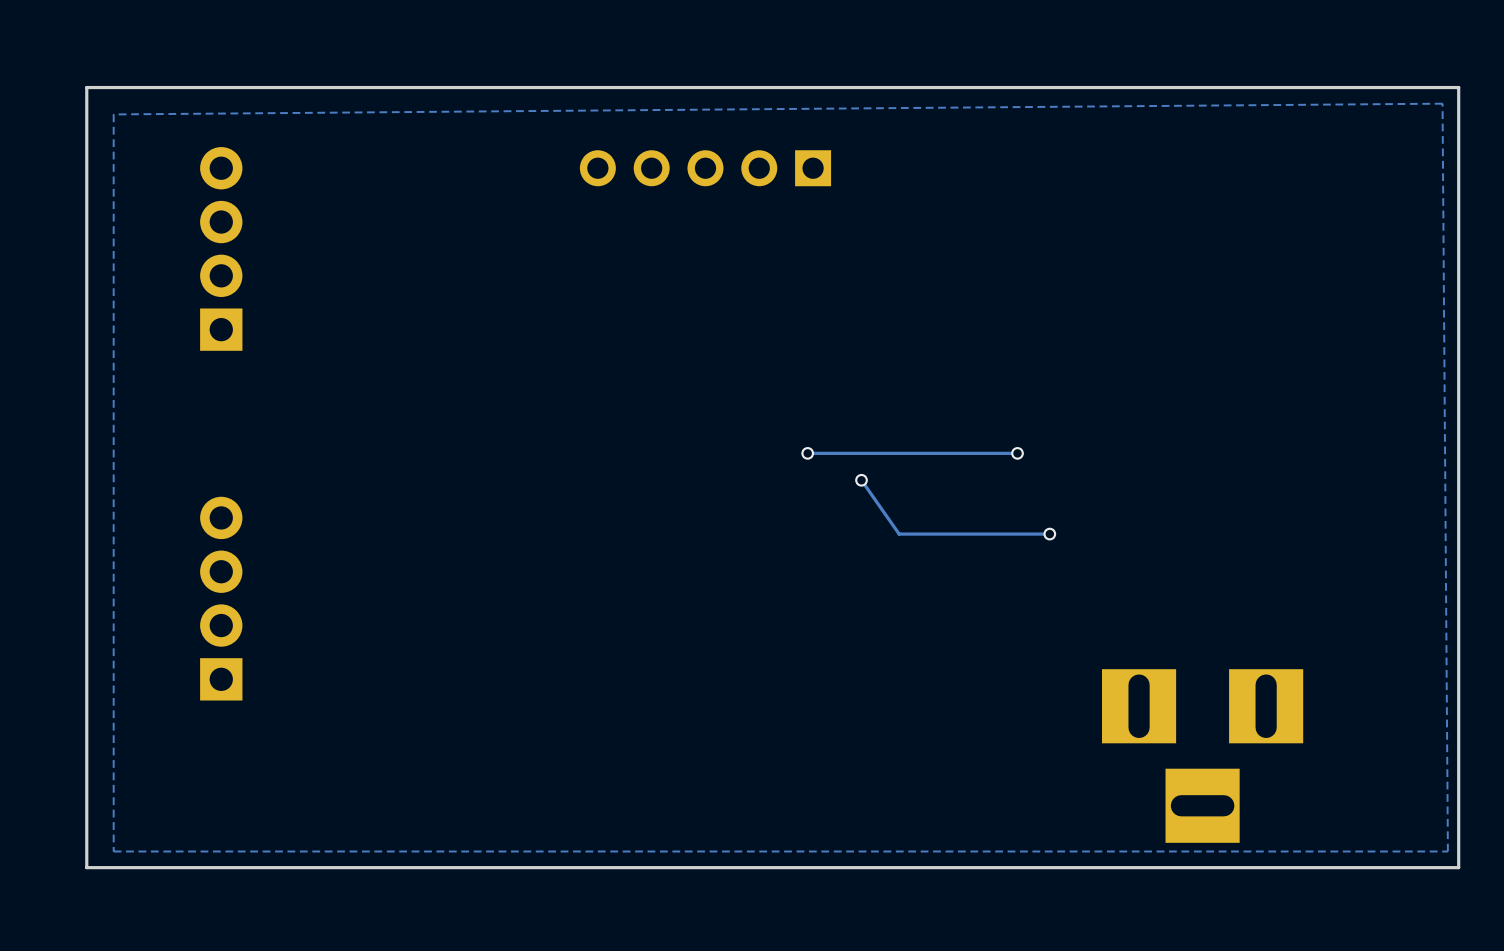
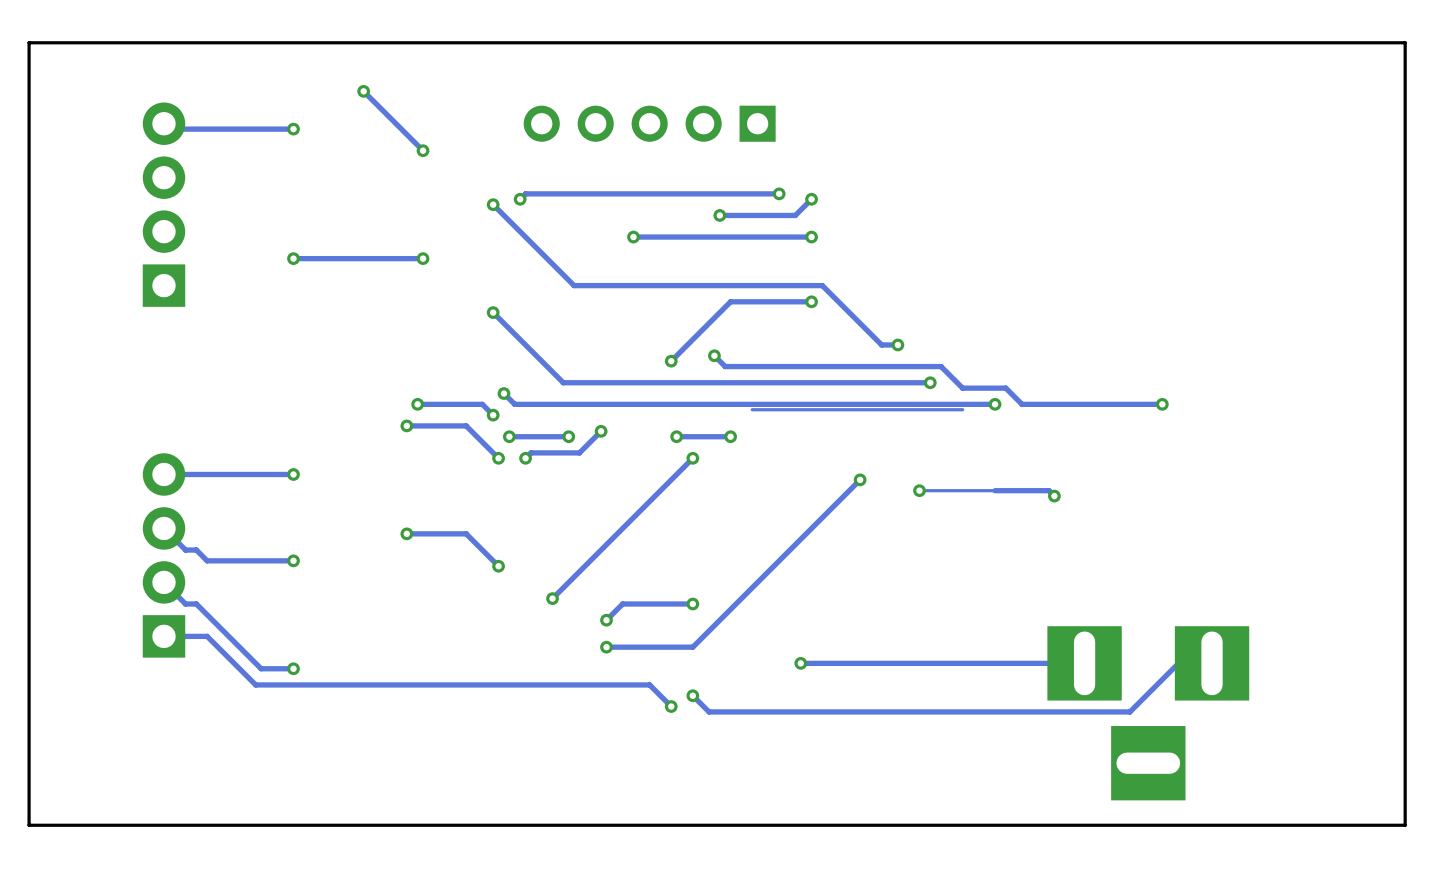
zone outline: (1442, 103) (113, 114) (113, 851) (1447, 851) (1442, 103) -> none
track: none -> (363, 91) (423, 150)
via: none -> (363, 91)
track: none -> (163, 123) (169, 129) (293, 129)
via: none -> (293, 129)
via: none -> (423, 150)
track: none -> (779, 193) (525, 193) (520, 199)
via: none -> (779, 193)
via: none -> (520, 199)
track: none -> (811, 199) (795, 215) (719, 215)
via: none -> (811, 199)
track: none -> (493, 204) (574, 285) (822, 285) (881, 344) (897, 344)
via: none -> (493, 204)
via: none -> (719, 215)
via: none -> (633, 237)
track: none -> (811, 237) (633, 237)
via: none -> (811, 237)
via: none -> (293, 258)
track: none -> (423, 258) (293, 258)
via: none -> (423, 258)
track: none -> (811, 301) (730, 301) (671, 361)
via: none -> (811, 301)
track: none -> (493, 312) (563, 382) (930, 382)
via: none -> (493, 312)
via: none -> (897, 344)
track: none -> (714, 355) (725, 366) (941, 366) (962, 388) (1005, 388) (1022, 404) (1162, 404)
via: none -> (714, 355)
via: none -> (671, 361)
via: none -> (930, 382)
track: none -> (503, 393) (514, 404) (995, 404)
via: none -> (503, 393)
track: none -> (417, 404) (482, 404) (493, 415)
via: none -> (417, 404)
via: none -> (995, 404)
via: none -> (1162, 404)
via: (807, 453) -> none
via: (1017, 453) -> none
via: none -> (493, 415)
track: none -> (406, 425) (466, 425) (498, 458)
via: none -> (406, 425)
track: none -> (601, 431) (579, 452) (530, 452) (525, 458)
via: none -> (601, 431)
via: none -> (509, 436)
track: none -> (568, 436) (509, 436)
via: none -> (568, 436)
via: none -> (676, 436)
track: none -> (730, 436) (676, 436)
via: none -> (730, 436)
track: (861, 480) (899, 534) (974, 534) -> none
via: (861, 480) -> none
via: none -> (498, 458)
via: none -> (525, 458)
track: none -> (692, 458) (552, 598)
via: none -> (692, 458)
track: none -> (293, 474) (163, 474)
via: none -> (293, 474)
track: none -> (860, 479) (692, 647) (606, 647)
via: none -> (860, 479)
via: none -> (919, 490)
track: none -> (995, 490) (1049, 490) (1054, 496)
via: (1049, 534) -> none
via: none -> (1054, 496)
track: none -> (163, 528) (185, 550) (196, 550) (207, 560) (293, 560)
track: none -> (406, 533) (466, 533) (498, 566)
via: none -> (406, 533)
via: none -> (293, 560)
via: none -> (498, 566)
track: none -> (163, 582) (185, 604) (196, 604) (261, 668) (293, 668)
via: none -> (552, 598)
track: none -> (692, 604) (622, 604) (606, 620)
via: none -> (692, 604)
via: none -> (606, 620)
track: none -> (163, 636) (207, 636) (255, 684) (649, 684) (671, 706)
via: none -> (606, 647)
via: none -> (800, 663)
track: none -> (1084, 663) (800, 663)
track: none -> (1212, 663) (1178, 663) (1129, 711) (709, 711) (692, 695)
via: none -> (293, 668)
via: none -> (692, 695)
via: none -> (671, 706)

